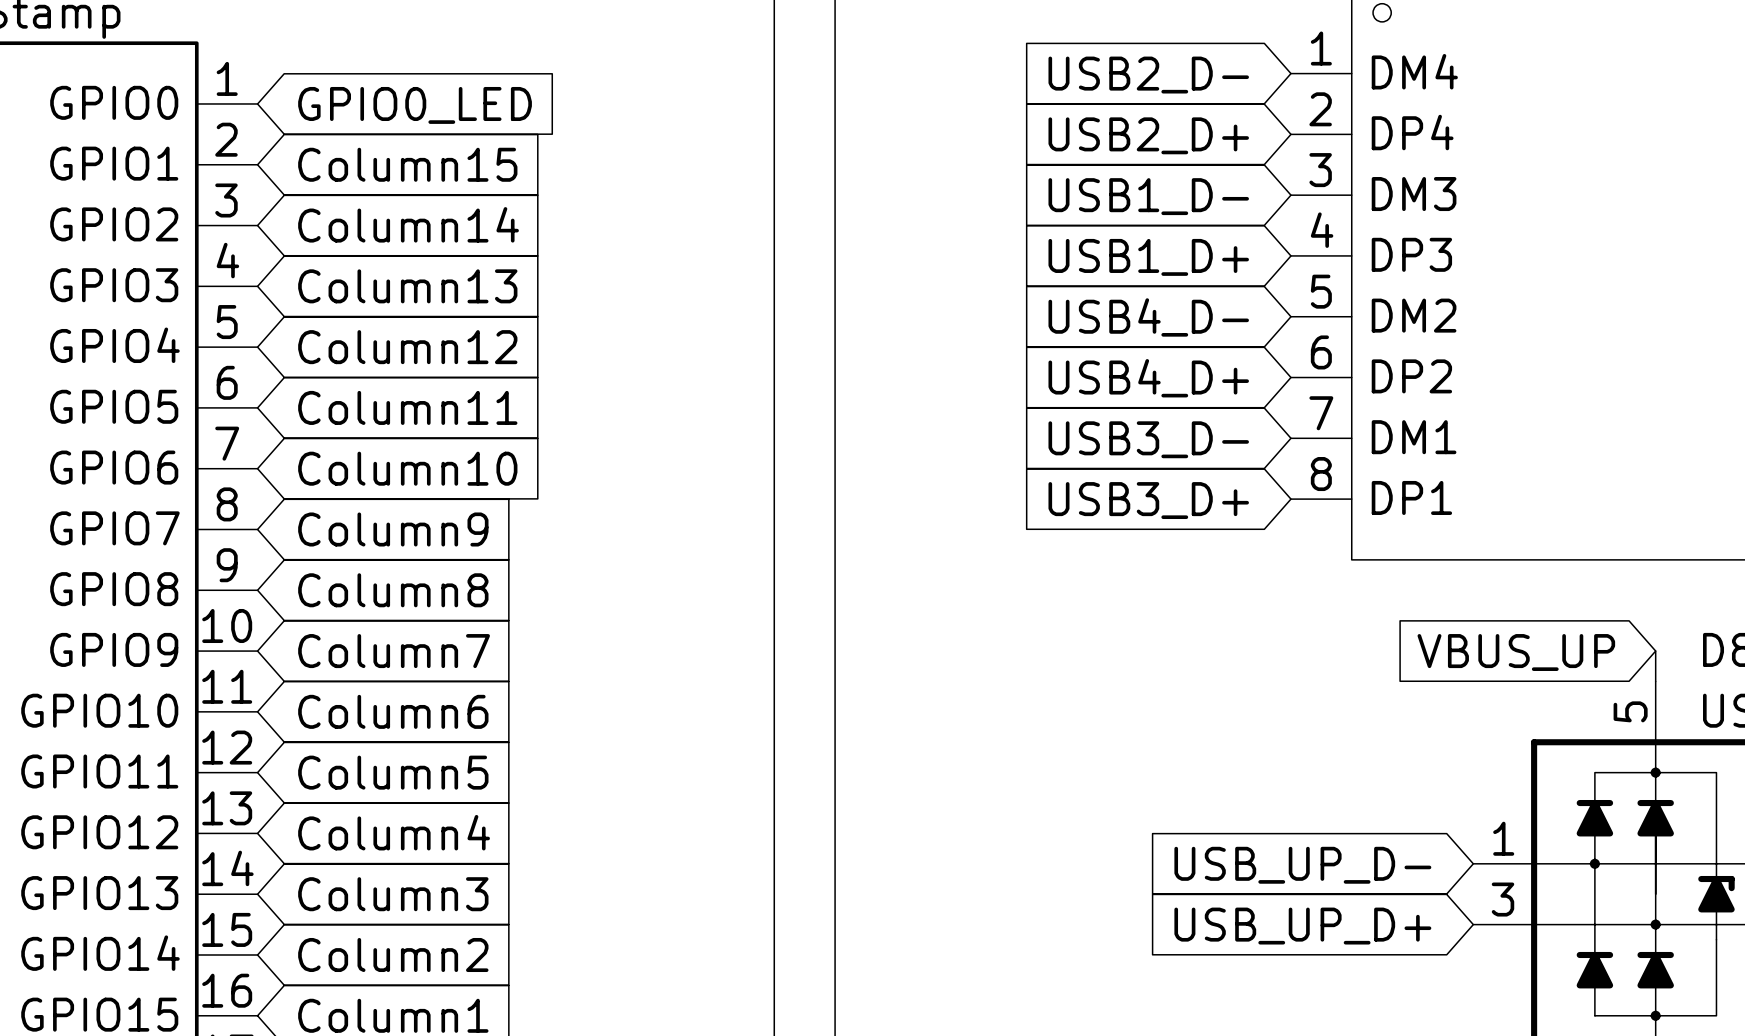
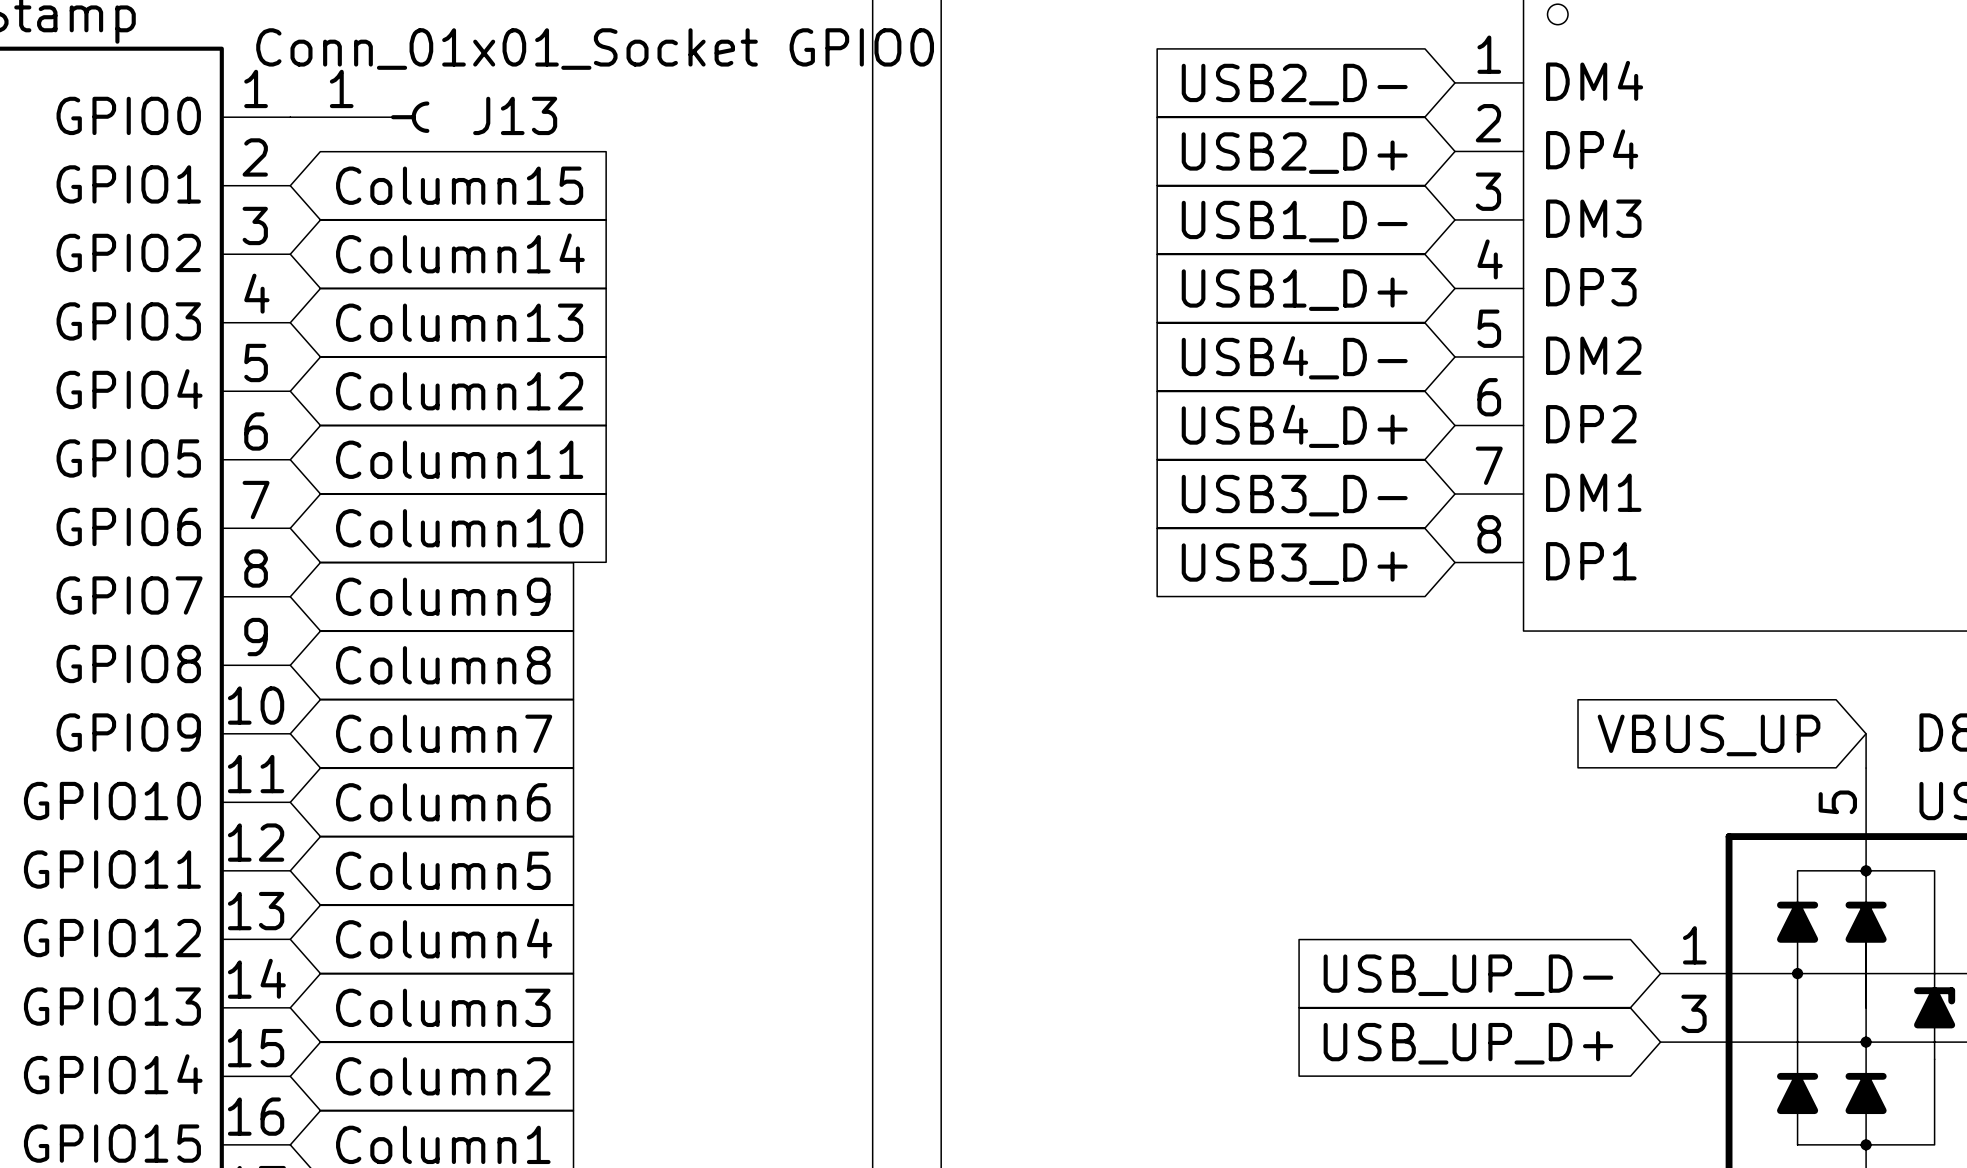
J13: none -> Conn_01x01_Socket GPIO0 (359, 117)
global label: GPIO0_LED (415, 105) -> none

